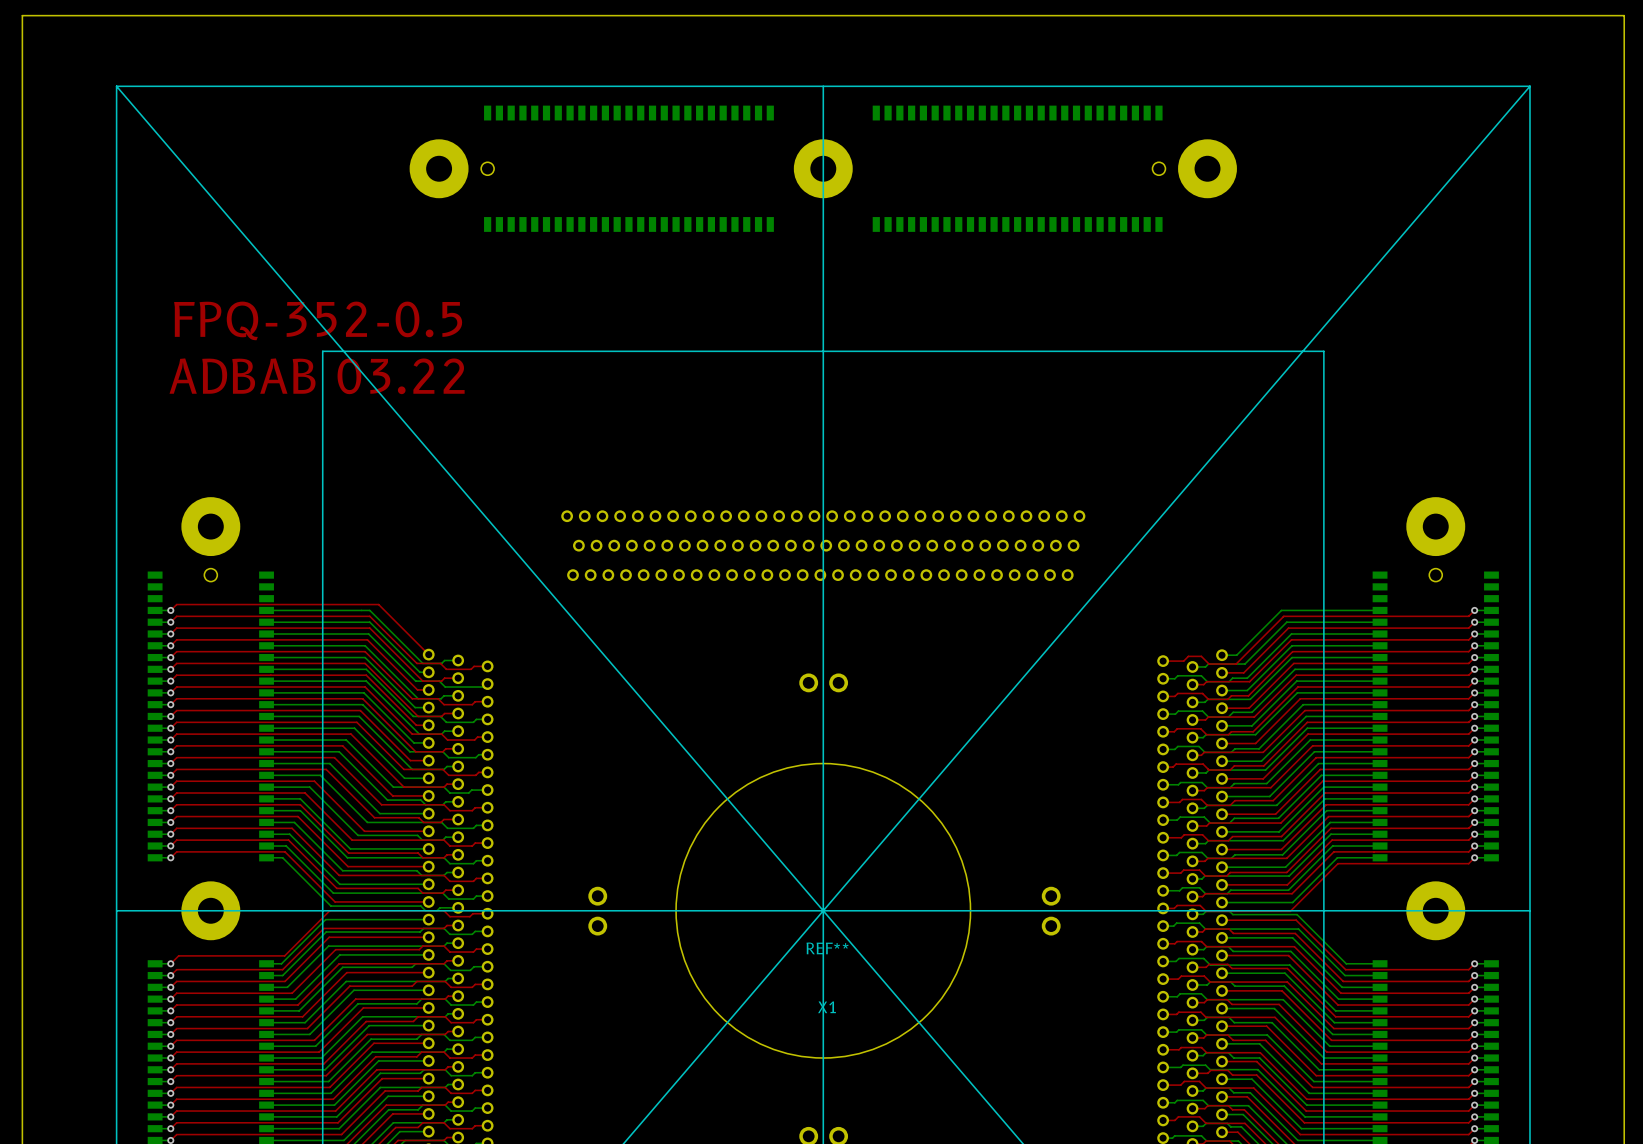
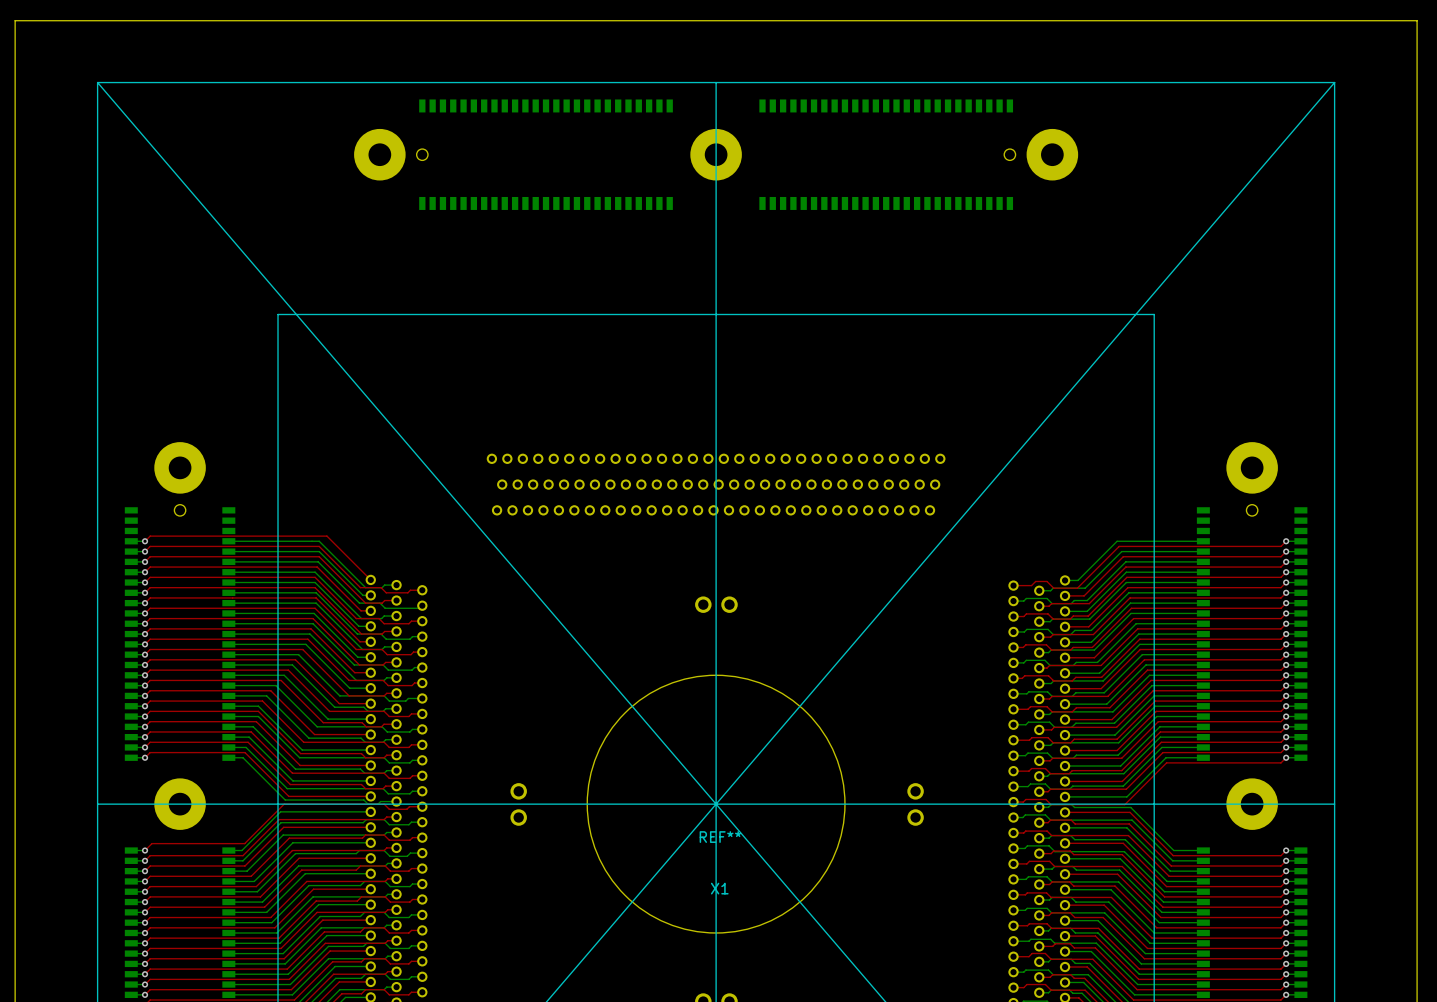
text: FPQ-352-0.5 (318, 320) -> none
text: ADBAB 03.22 (317, 376) -> none

